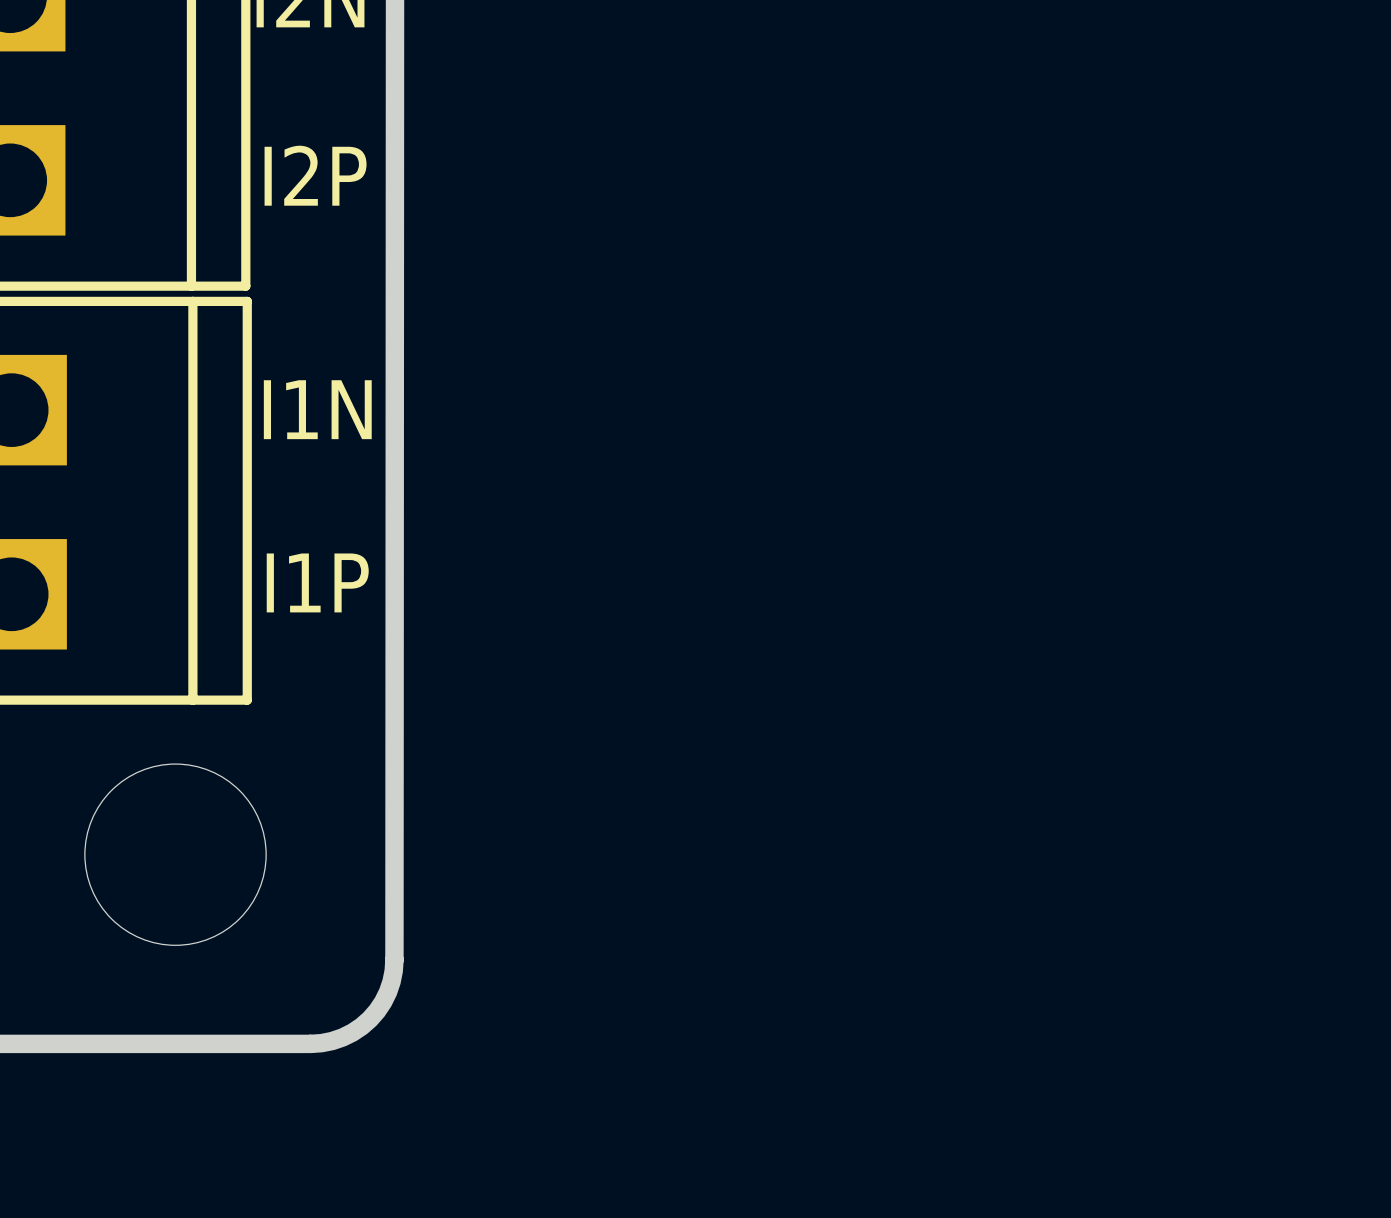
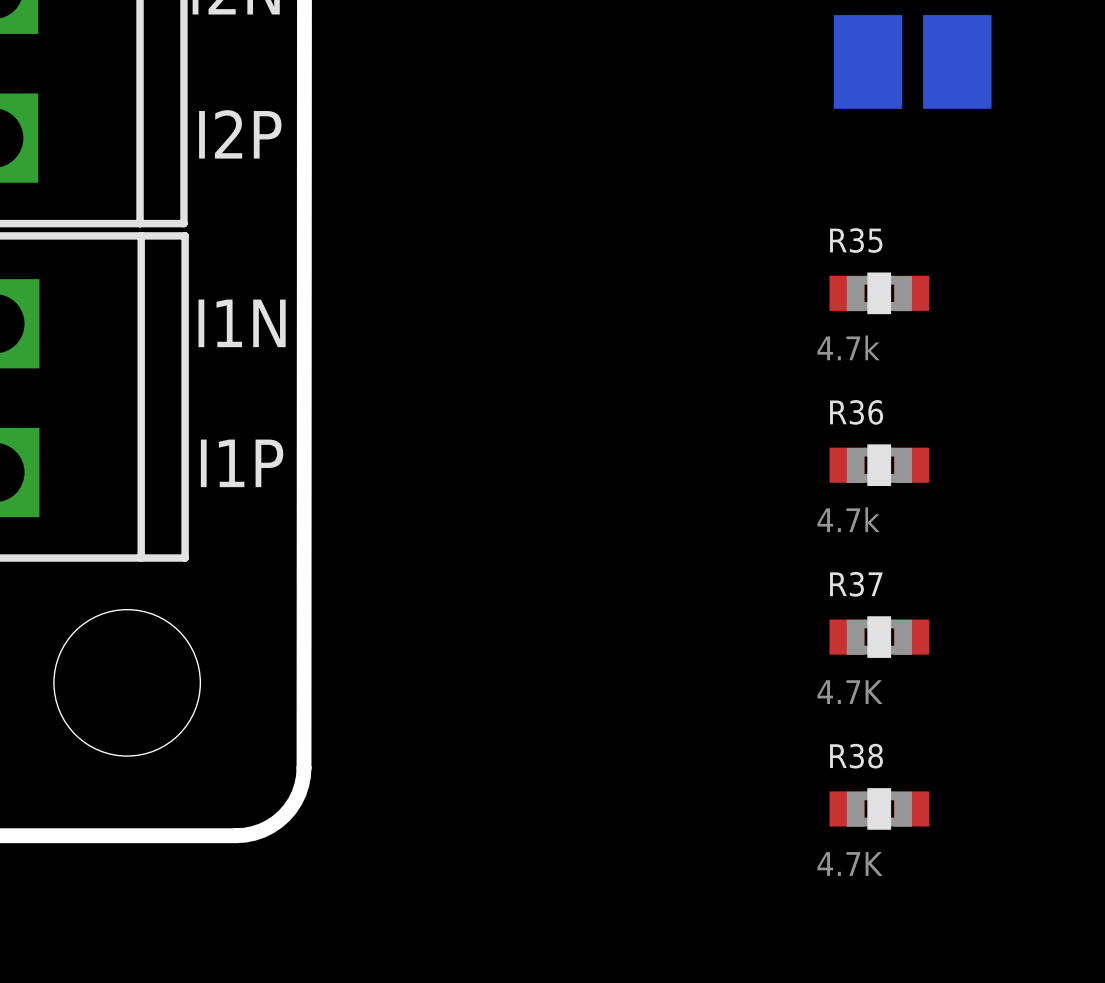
part: none -> (912, 61)
R35: none -> 4.7k (879, 293)
R36: none -> 4.7k (879, 465)
R37: none -> 4.7K (879, 637)
R38: none -> 4.7K (879, 808)

